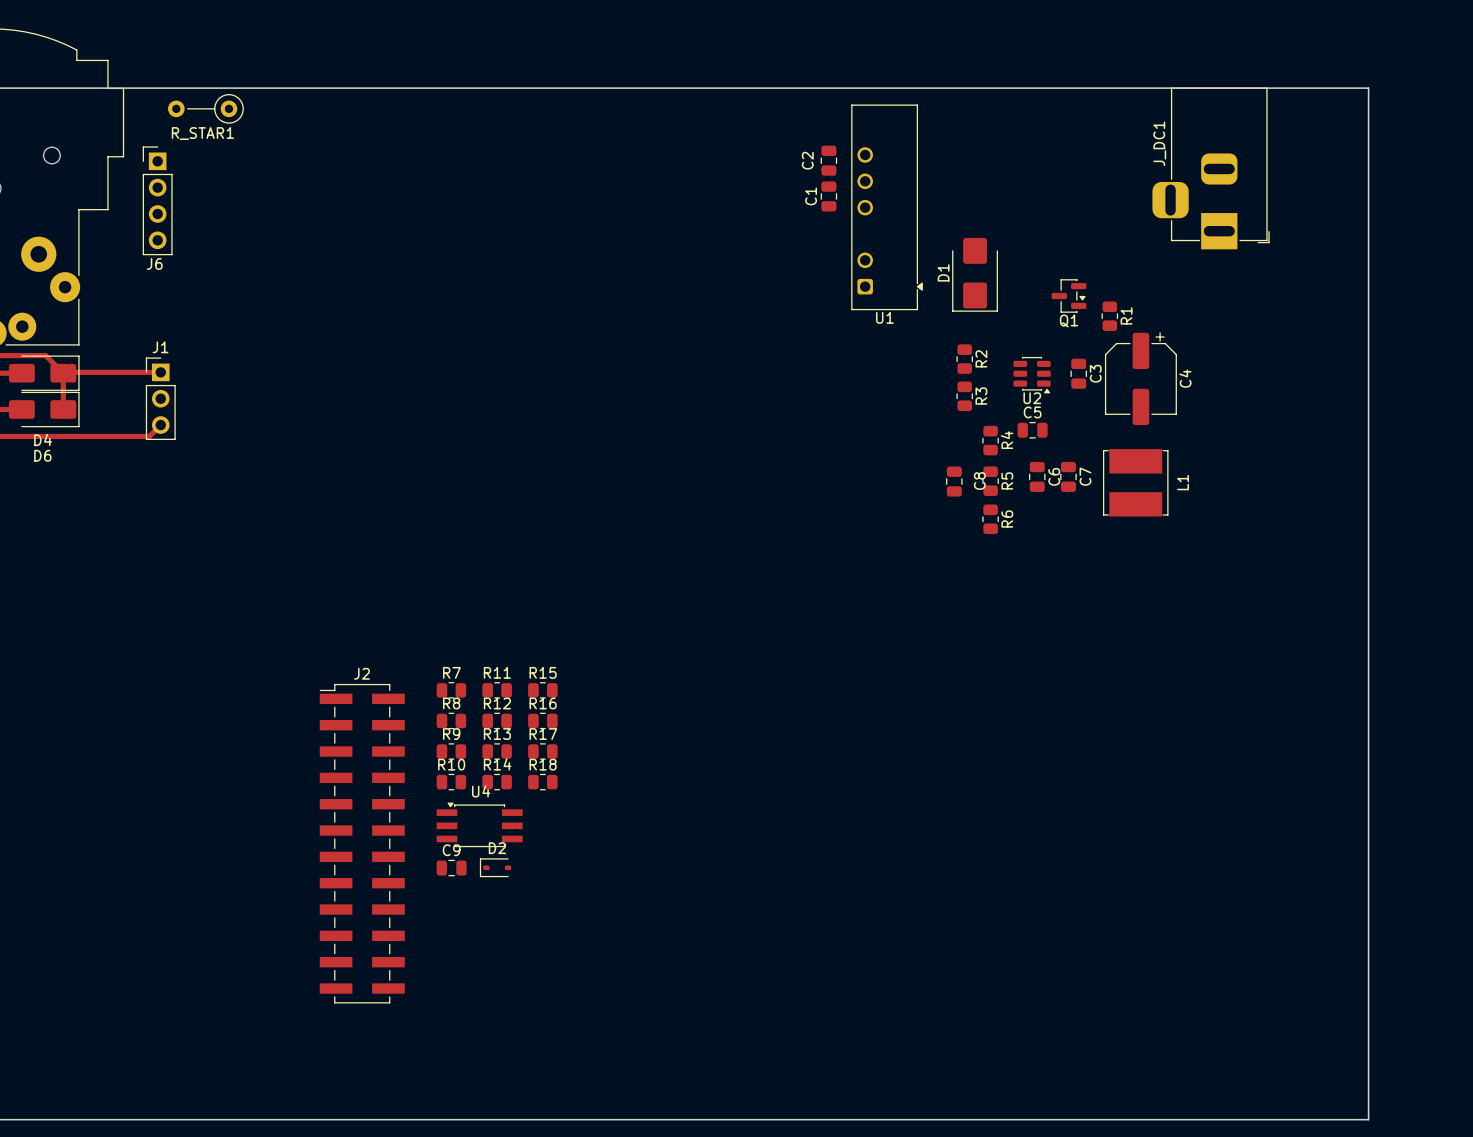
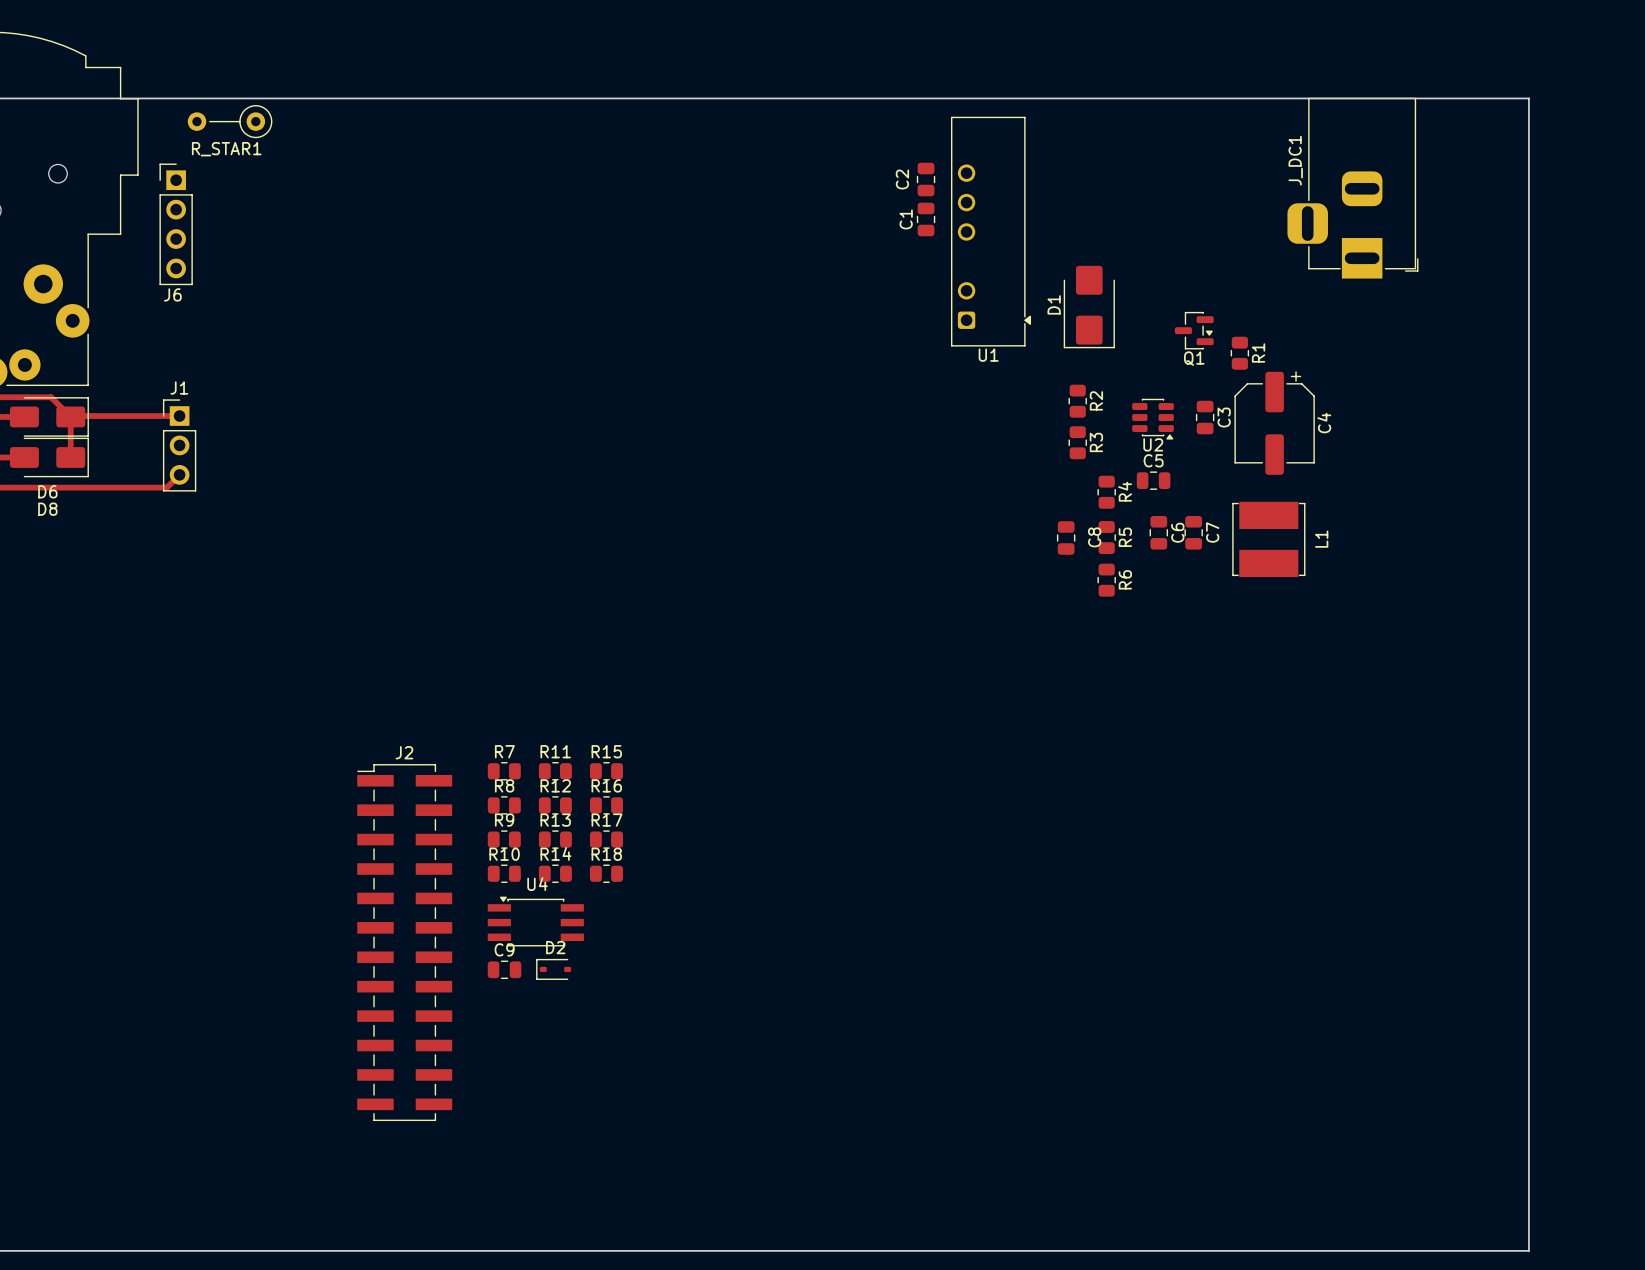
D4 name: D4 (43, 439) -> D6 (47, 491)
D6 name: D6 (42, 455) -> D8 (47, 509)

